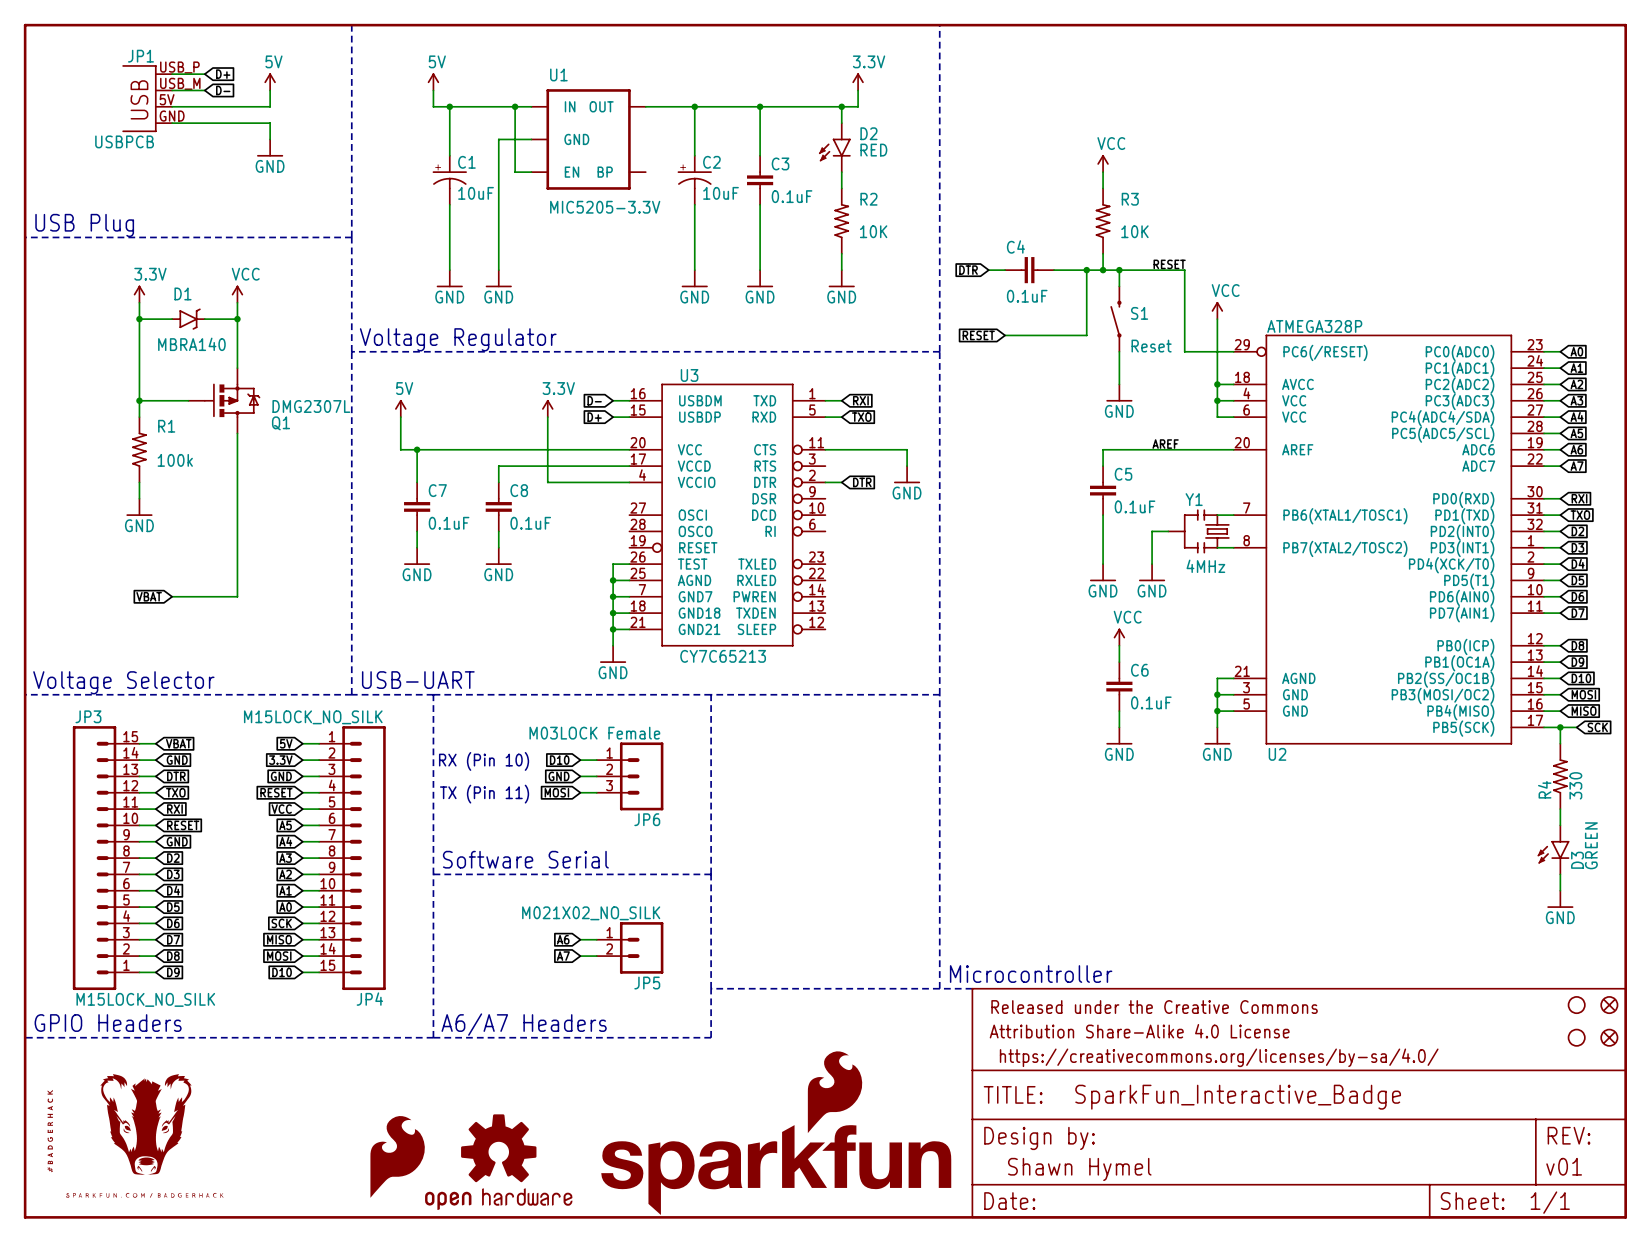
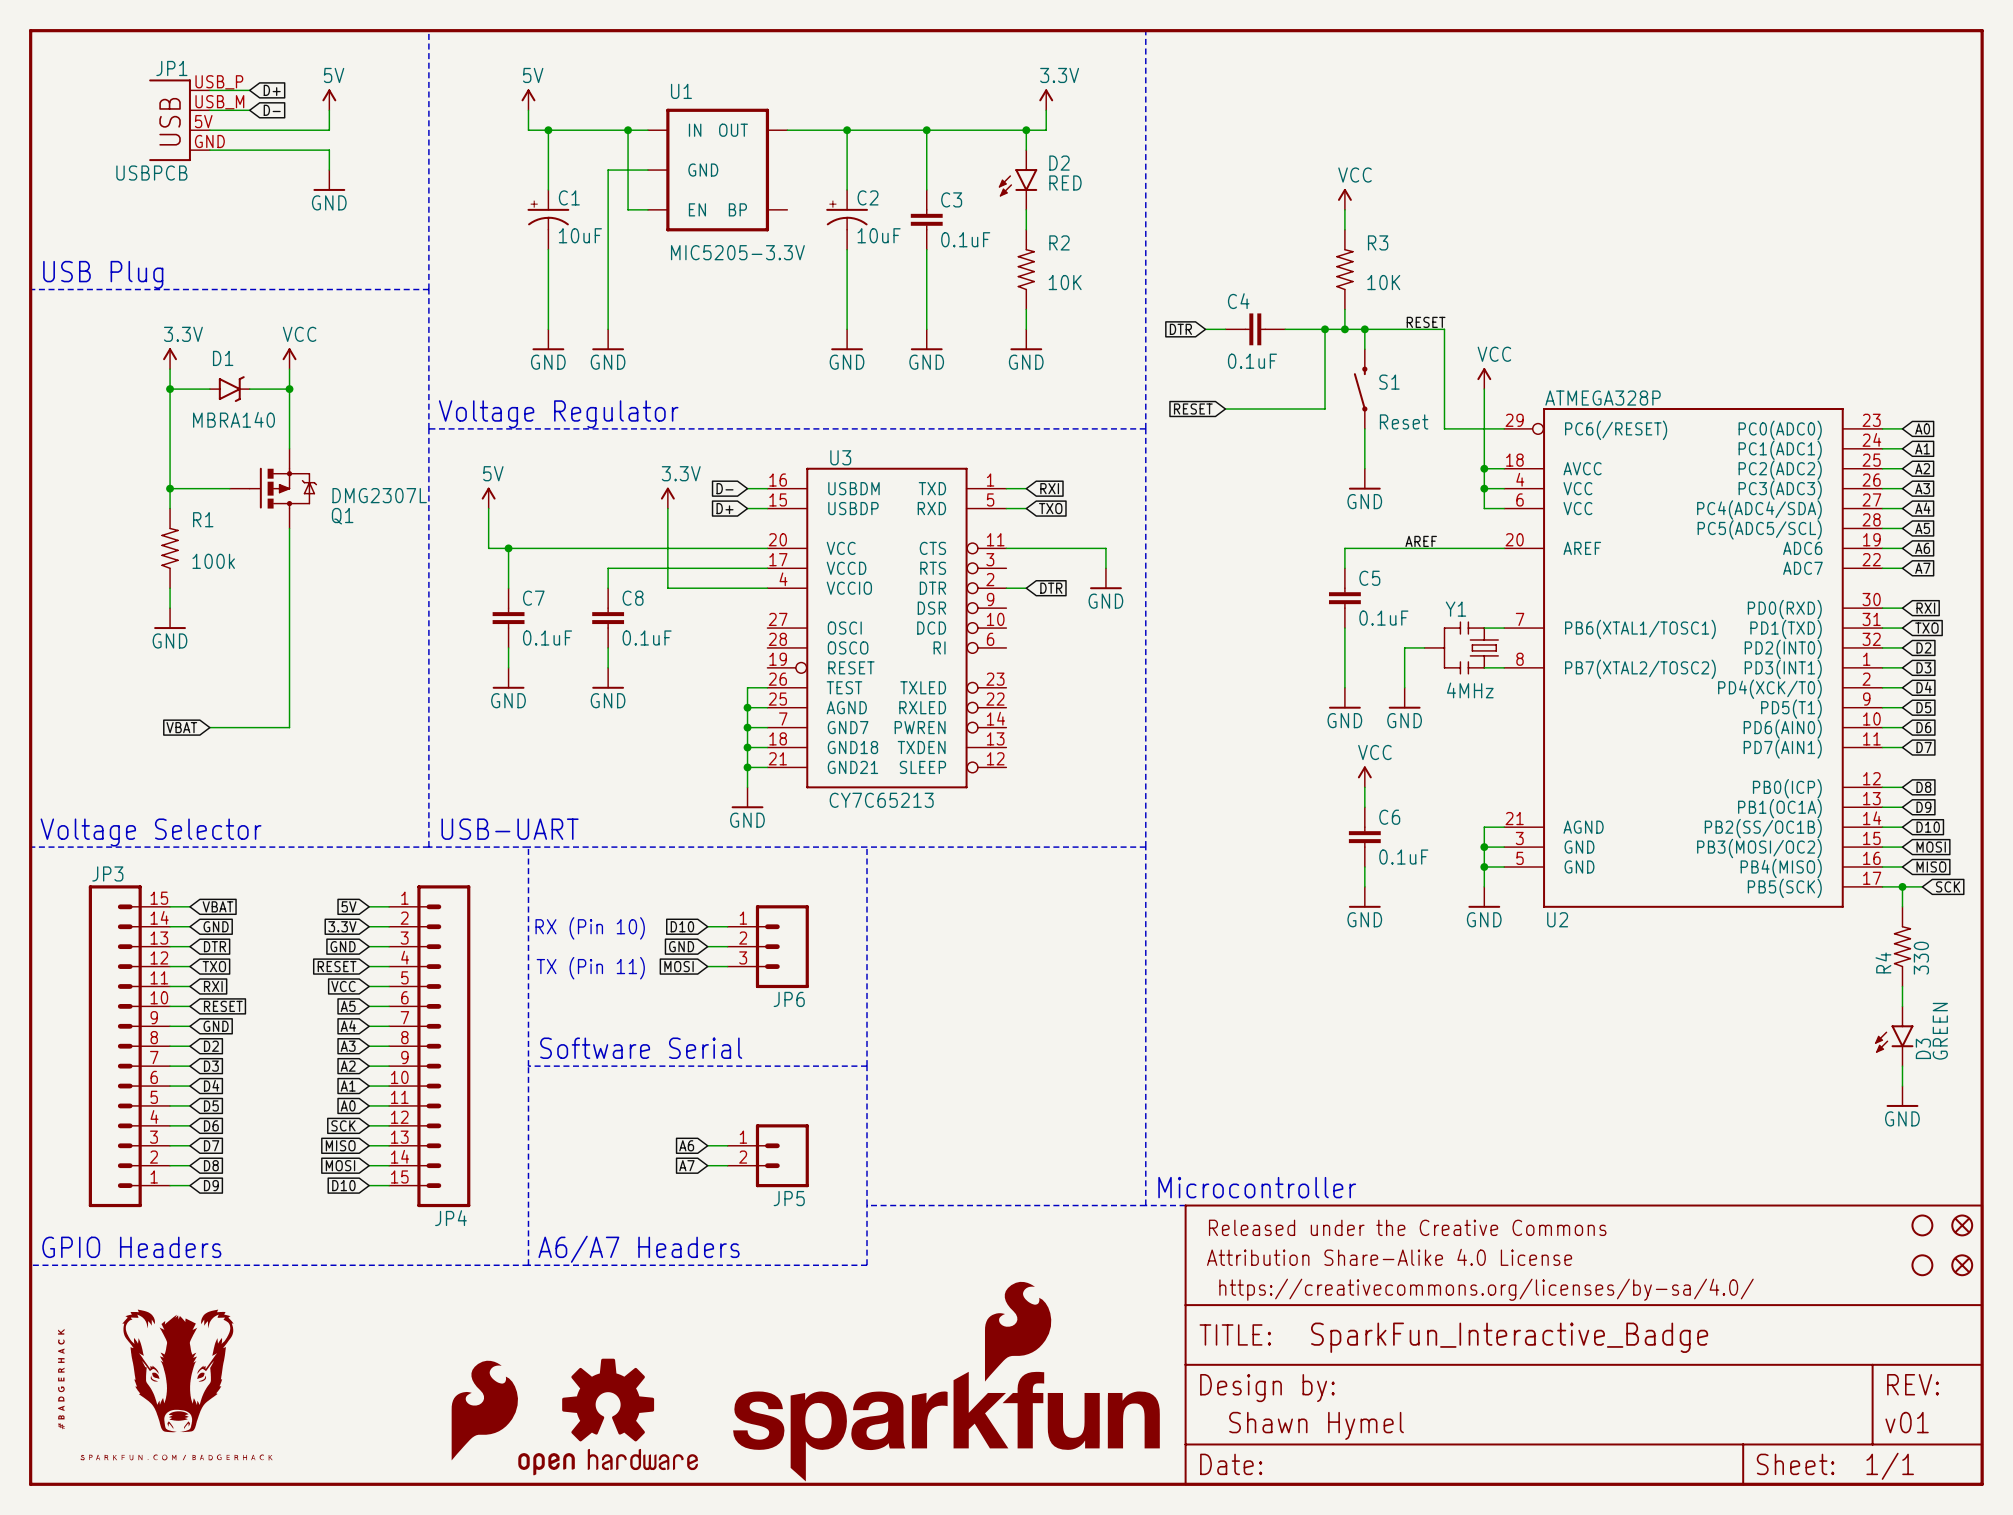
JP4 value: M15LOCK_NO_SILK (313, 717) -> none
JP6 value: M03LOCK Female (594, 733) -> none
JP5 value: M021X02_NO_SILK (591, 913) -> none
JP3 value: M15LOCK_NO_SILK (145, 999) -> none

